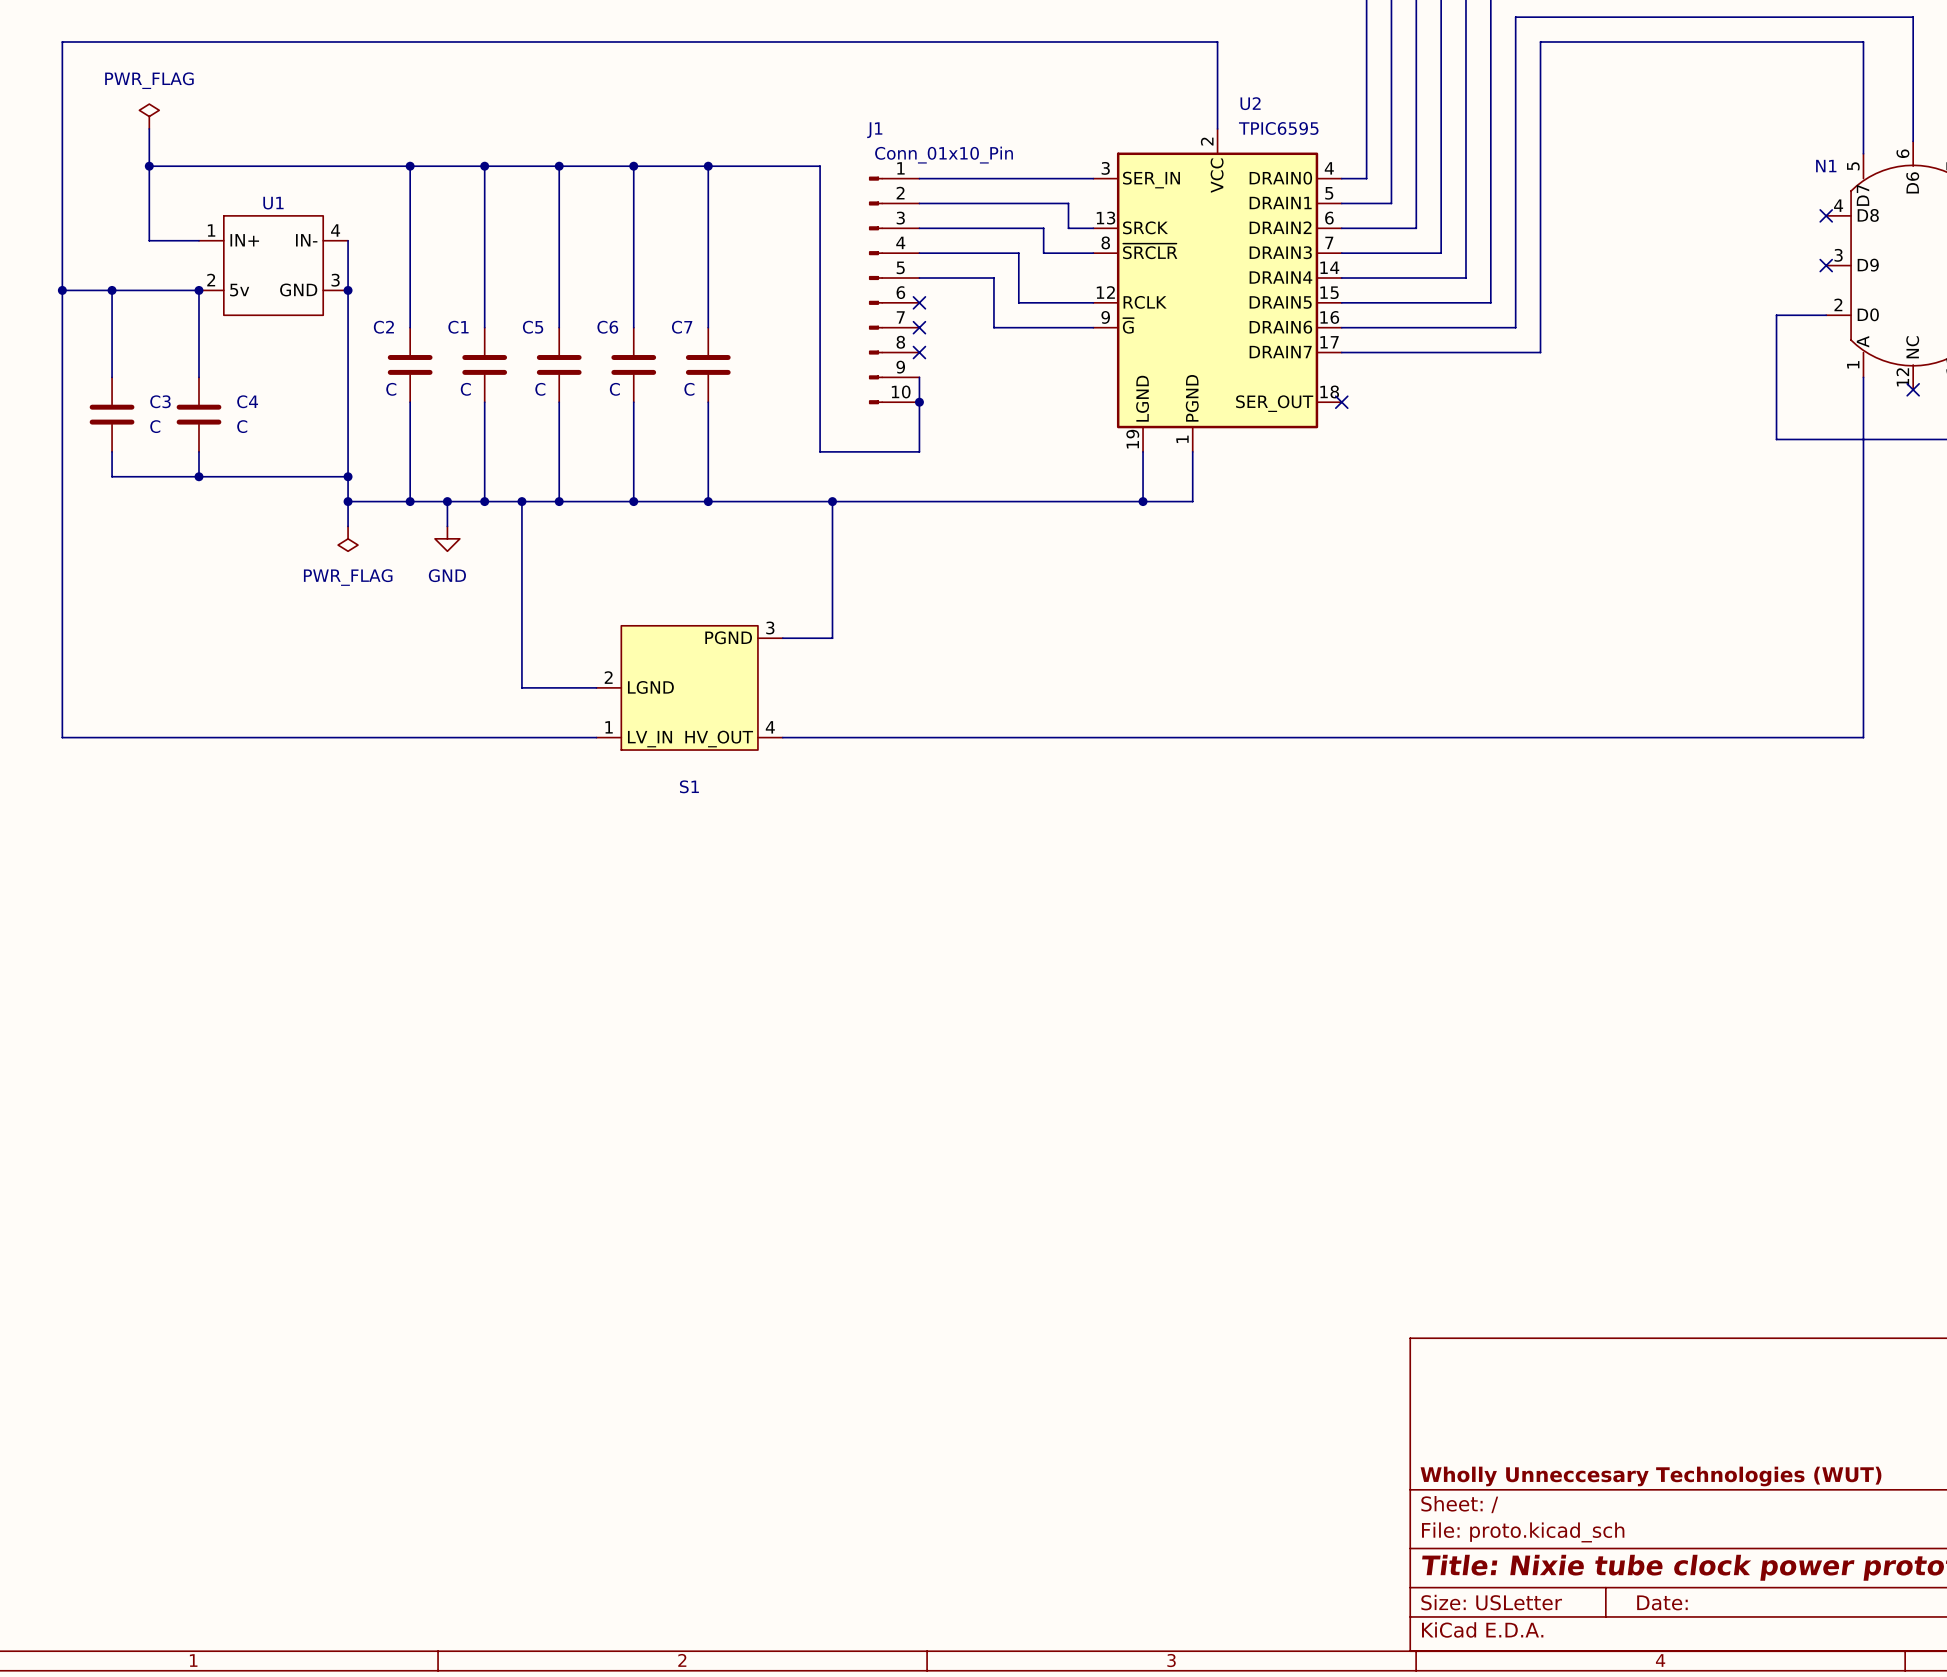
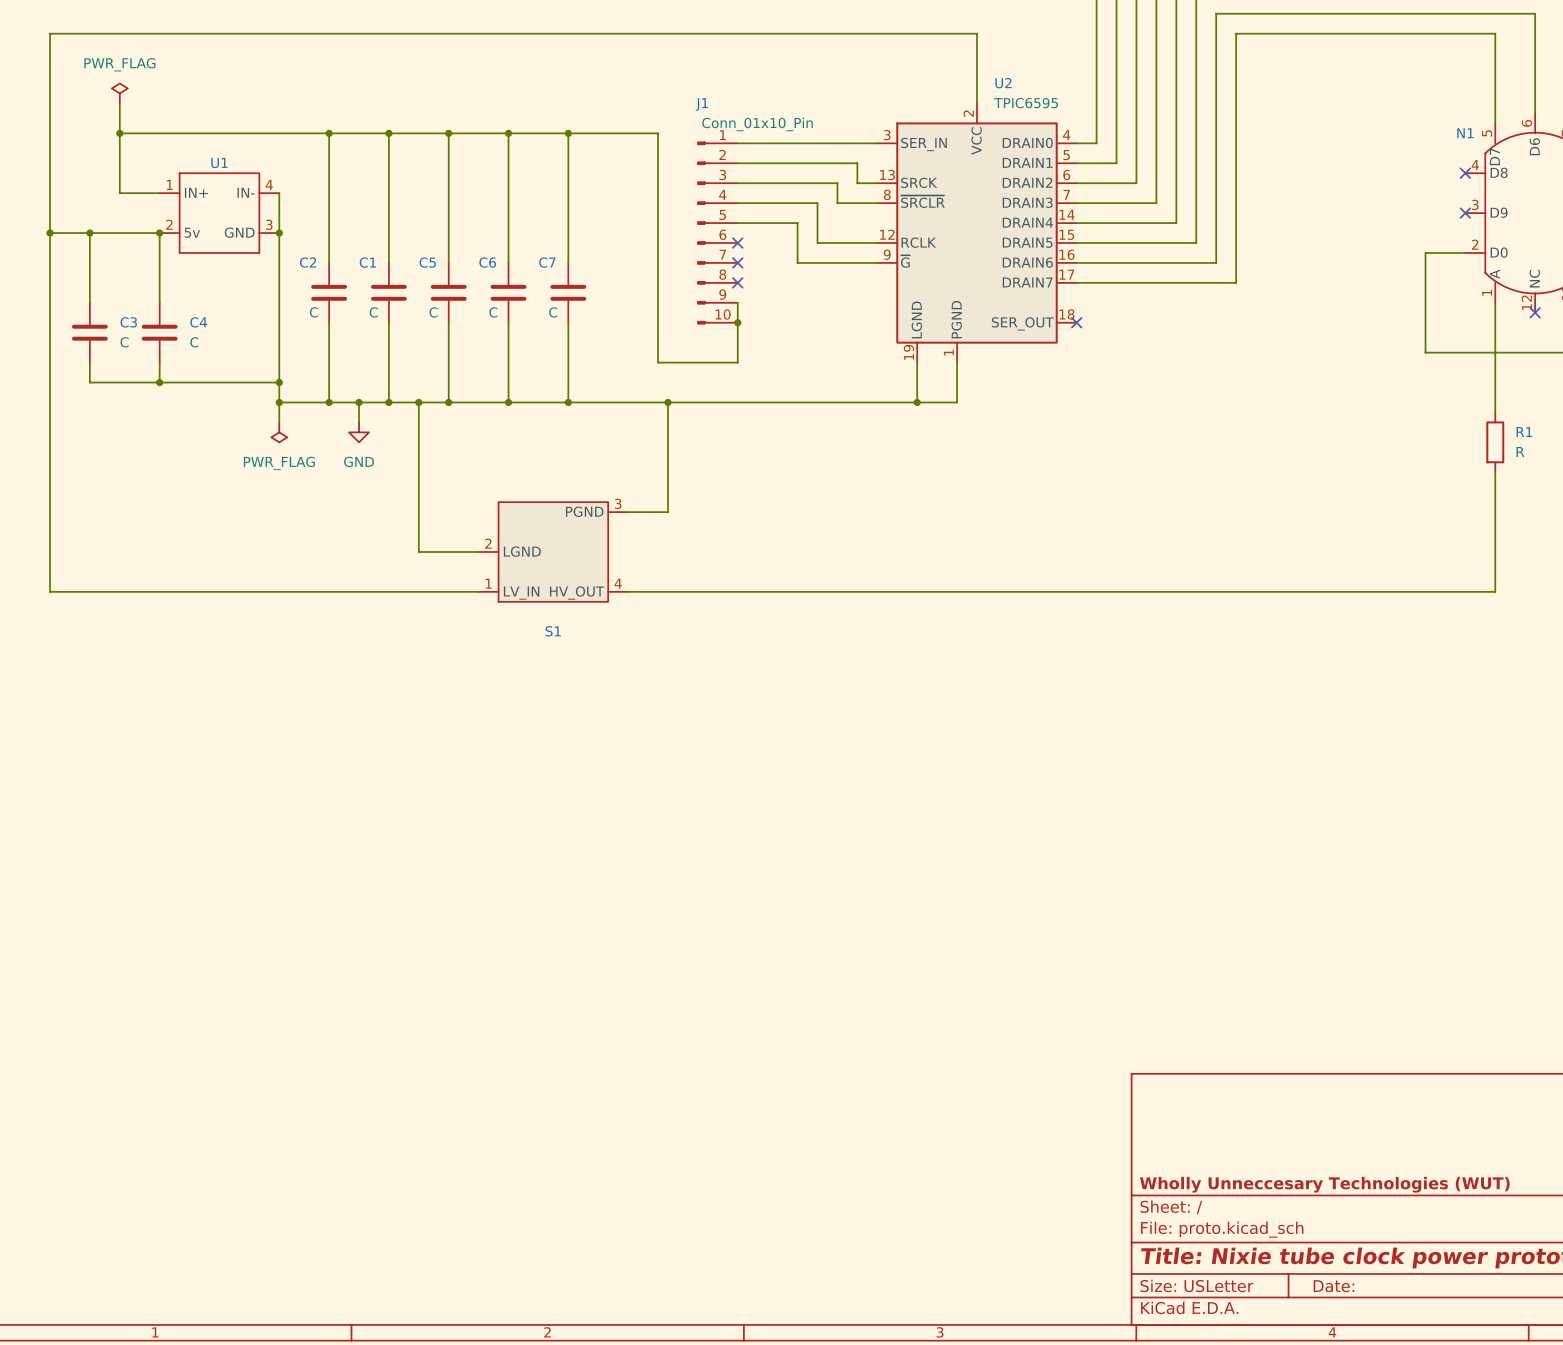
wire: (1863, 514) (1863, 588) -> none
R1: none -> R (1495, 442)

